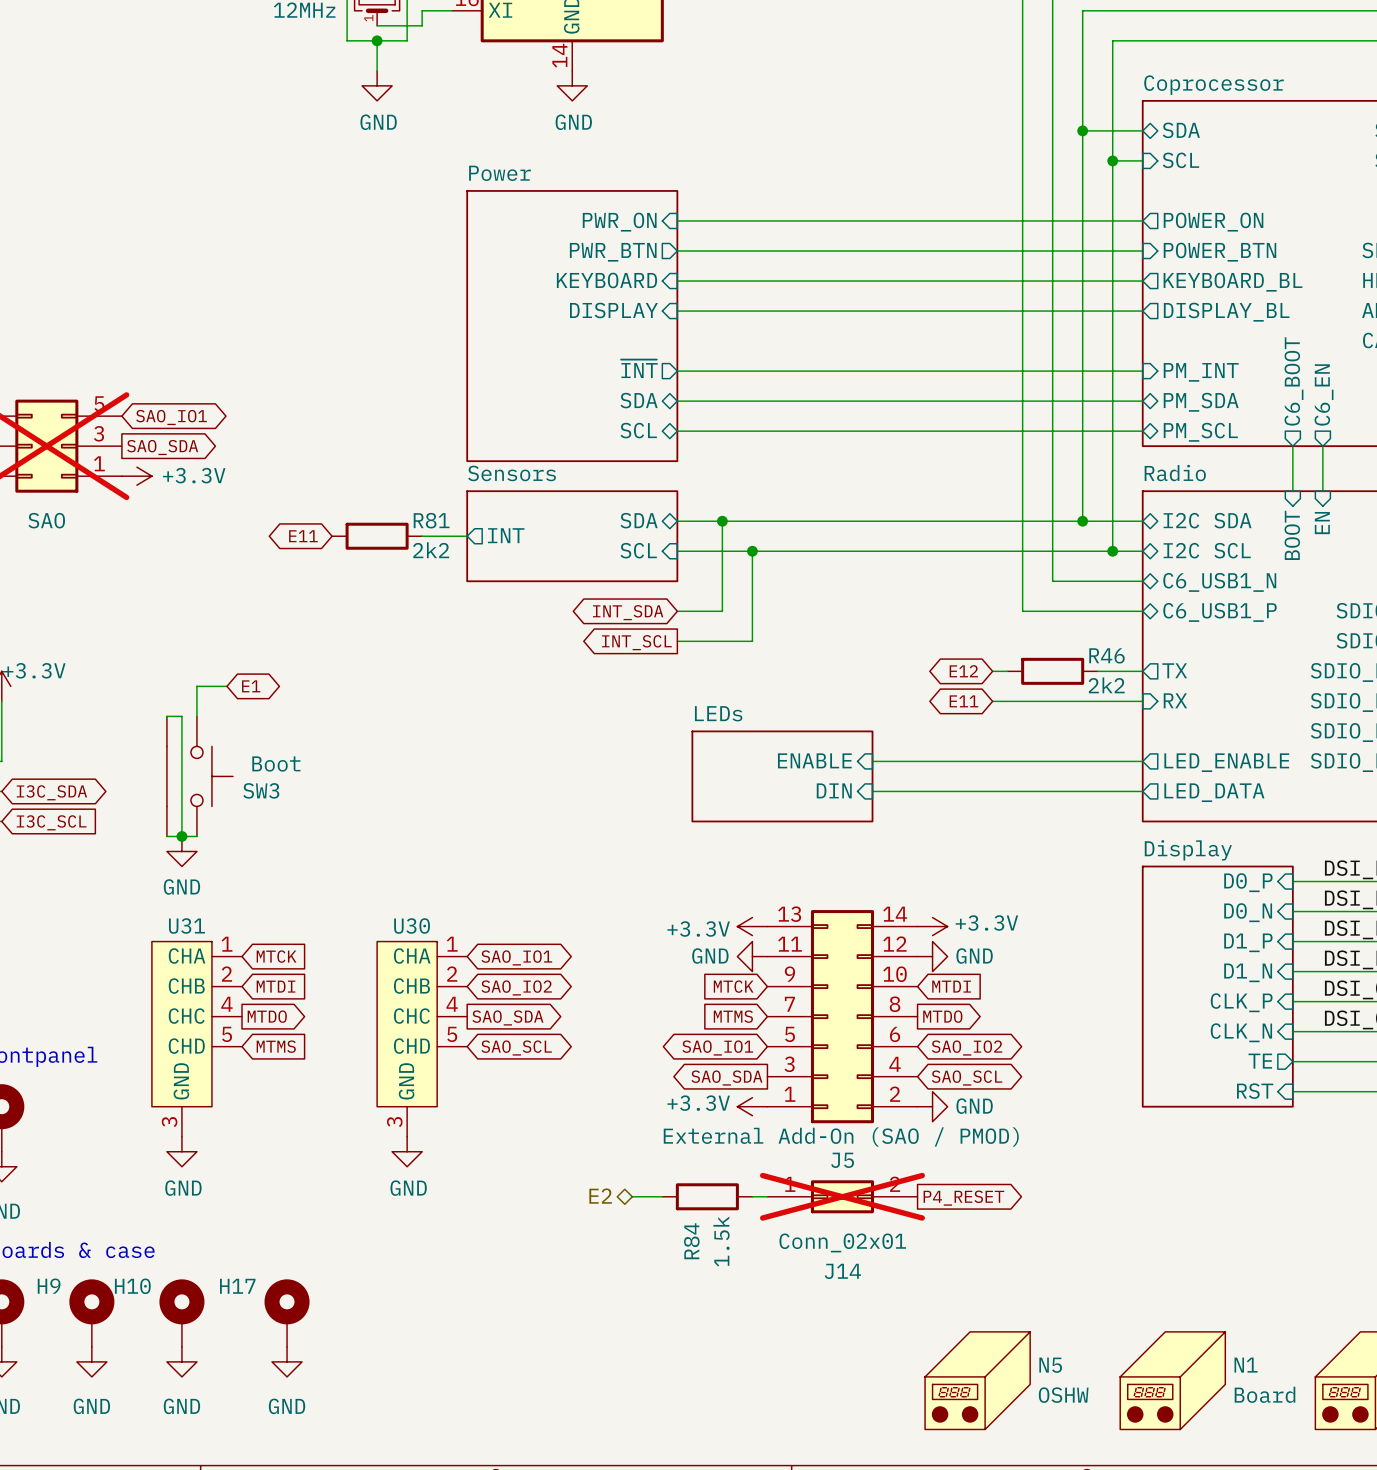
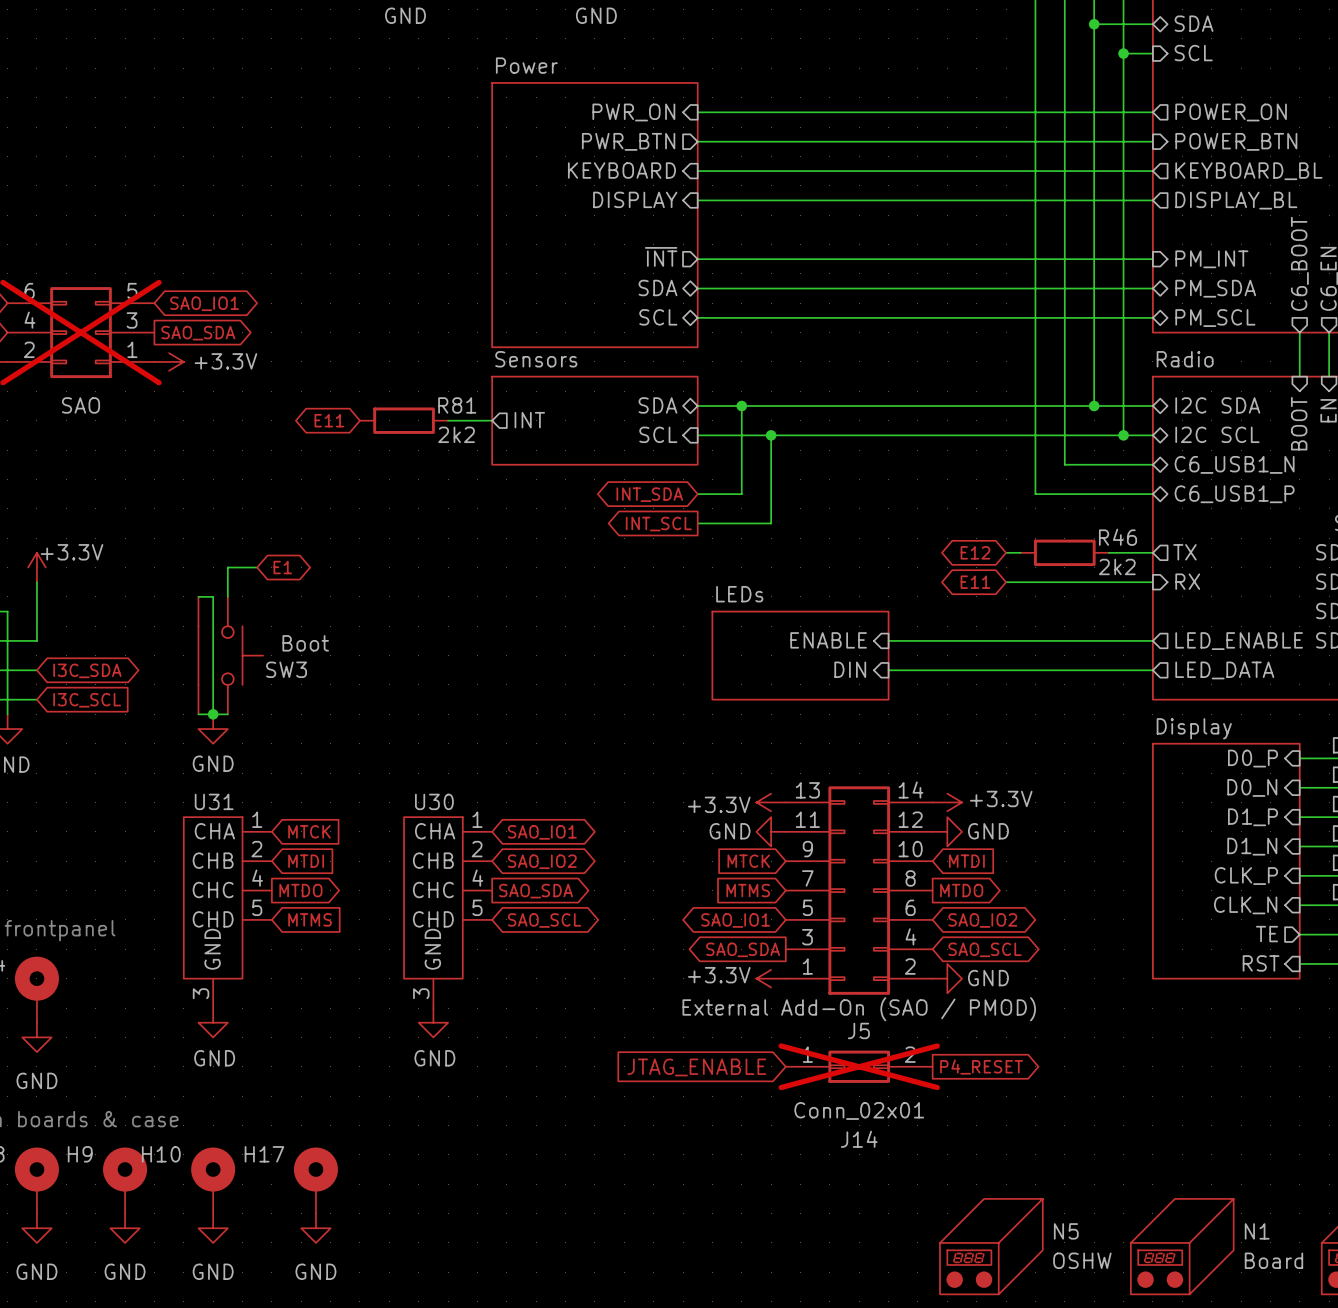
hierarchical label: E2 (600, 1196) -> none
wire: (632, 1196) (662, 1196) -> none
R84: 1.5k (707, 1196) -> none
wire: (752, 1196) (767, 1196) -> none
global label: none -> JTAG_ENABLE (696, 1067)

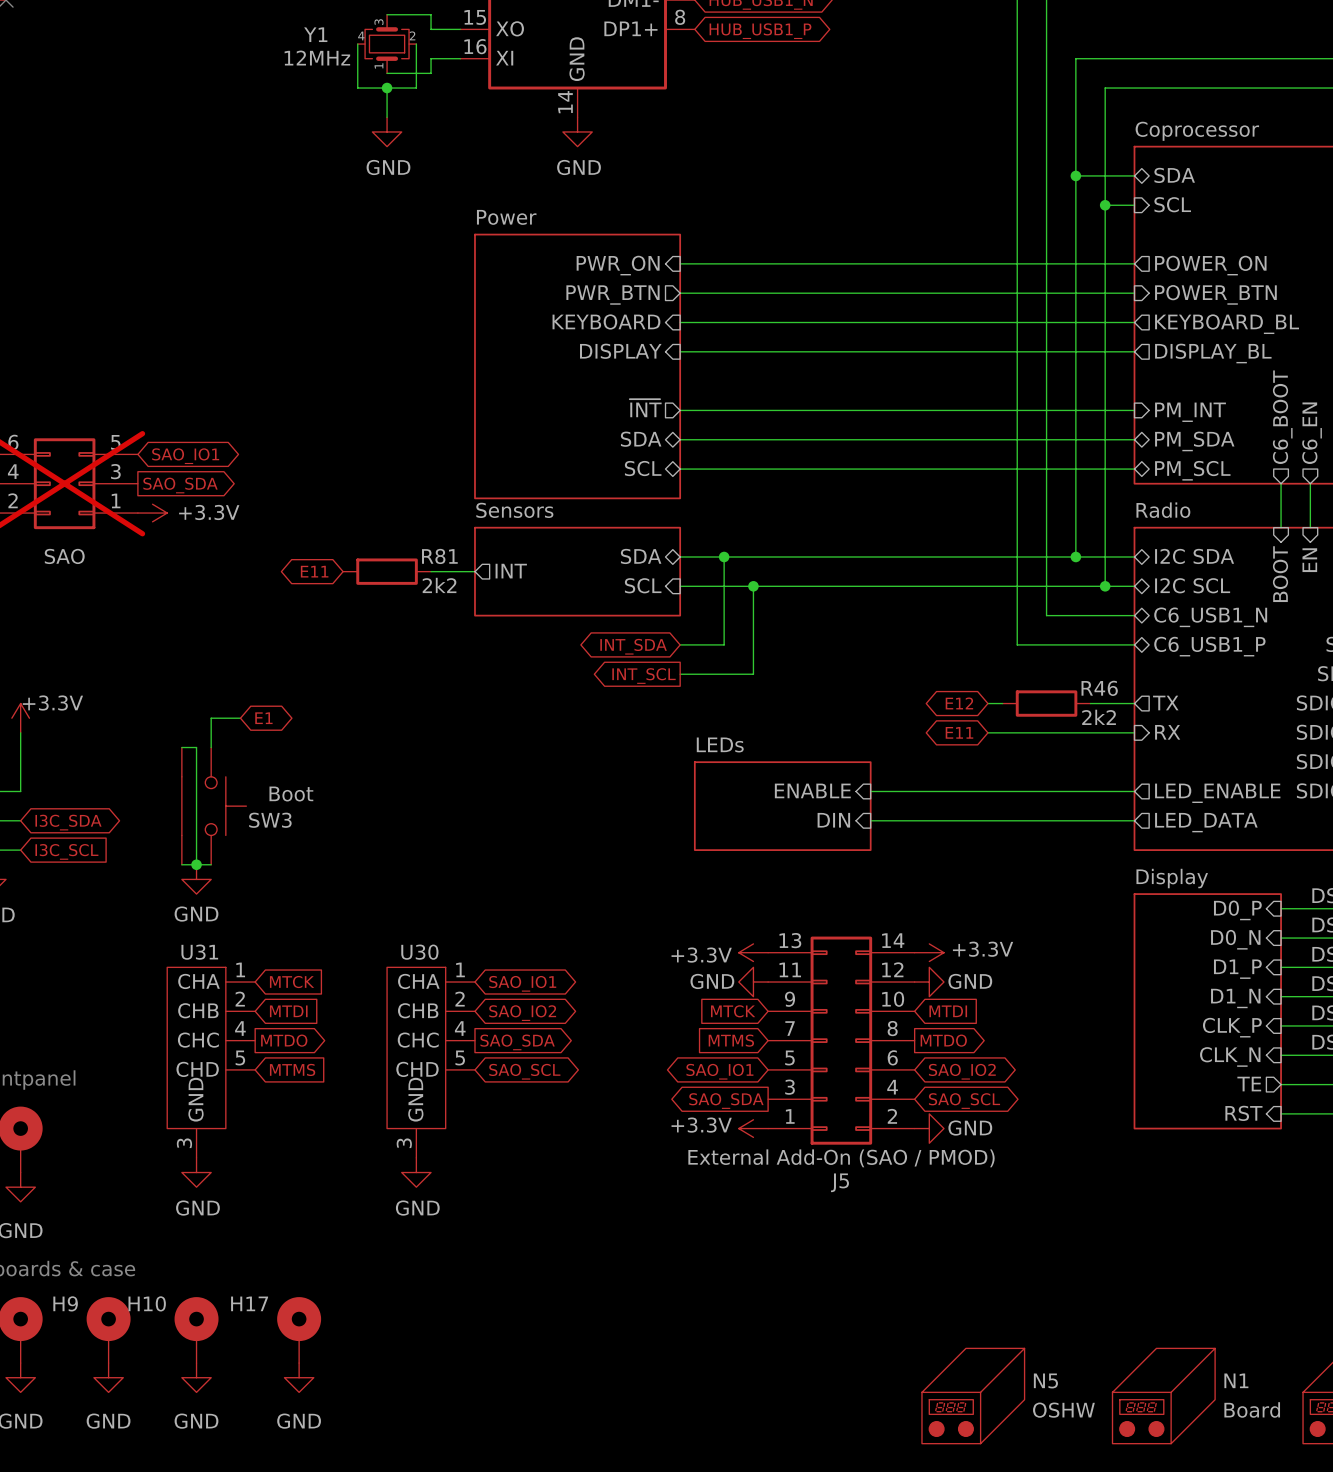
J14: Conn_02x01 (859, 1066) -> none
global label: JTAG_ENABLE (696, 1067) -> none
global label: P4_RESET (981, 1067) -> none

